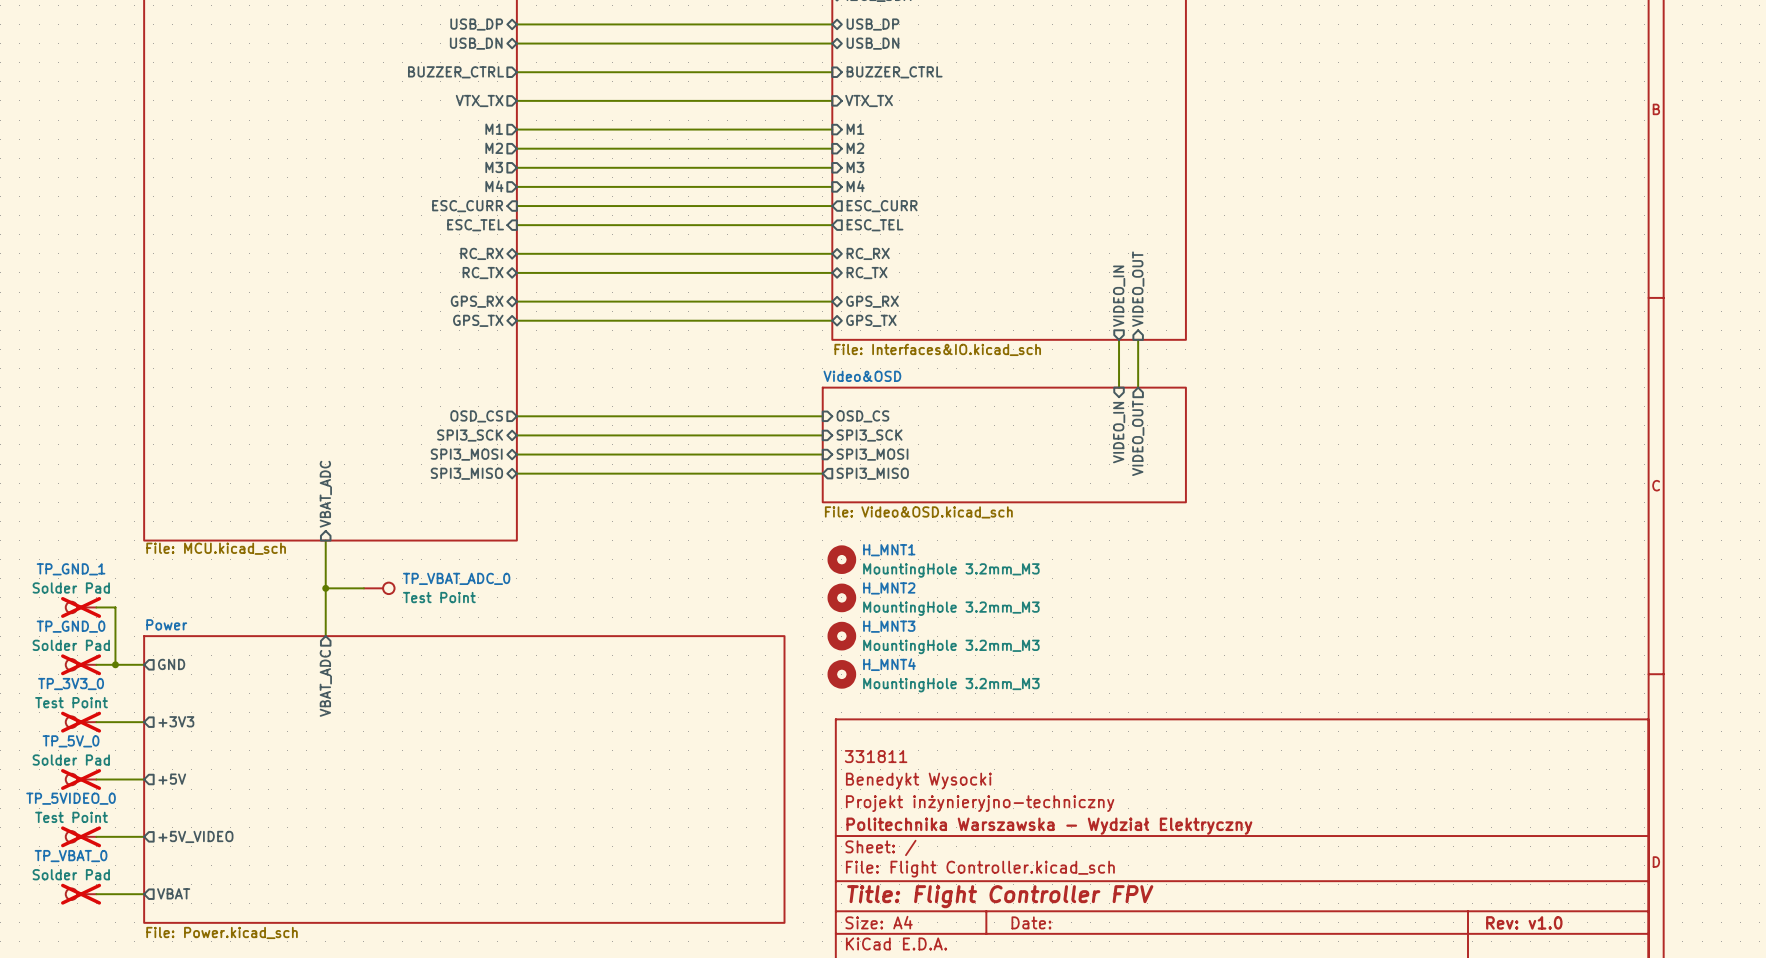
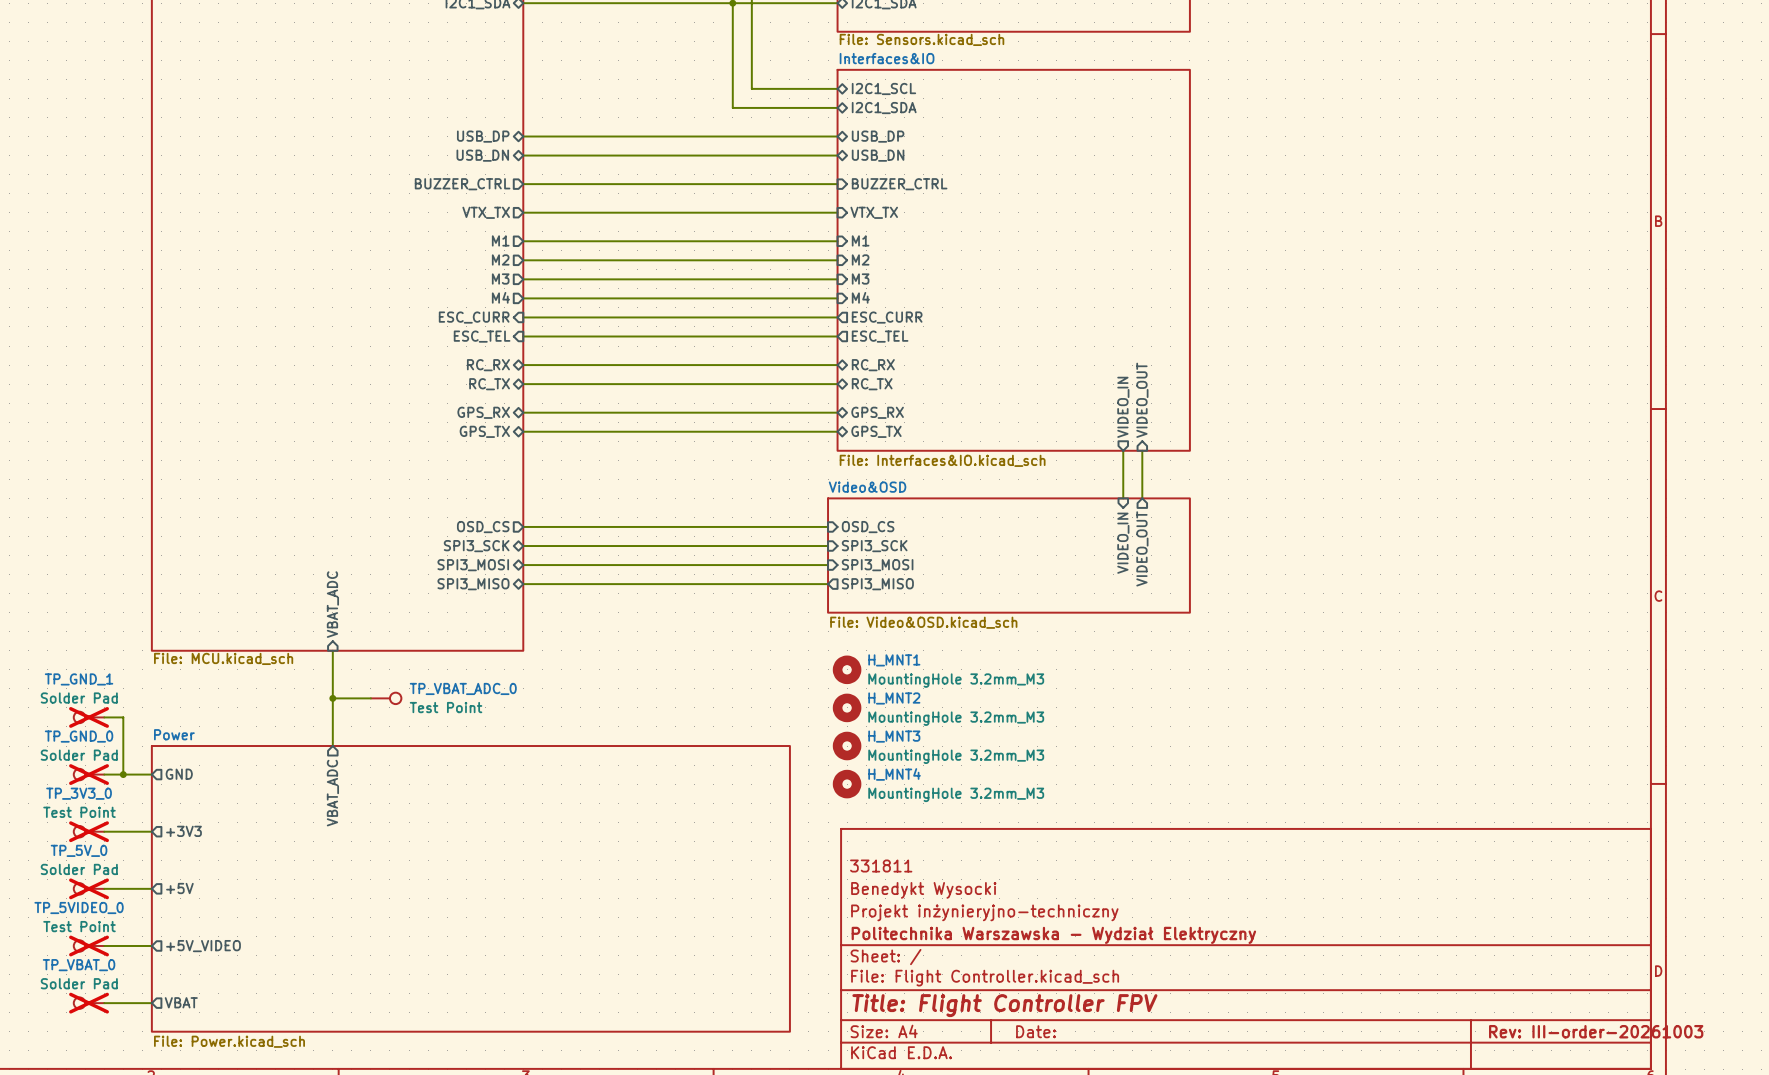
title block: Rev: v1.0 (1524, 922) -> Rev: III-order-20261003 (1596, 1031)

